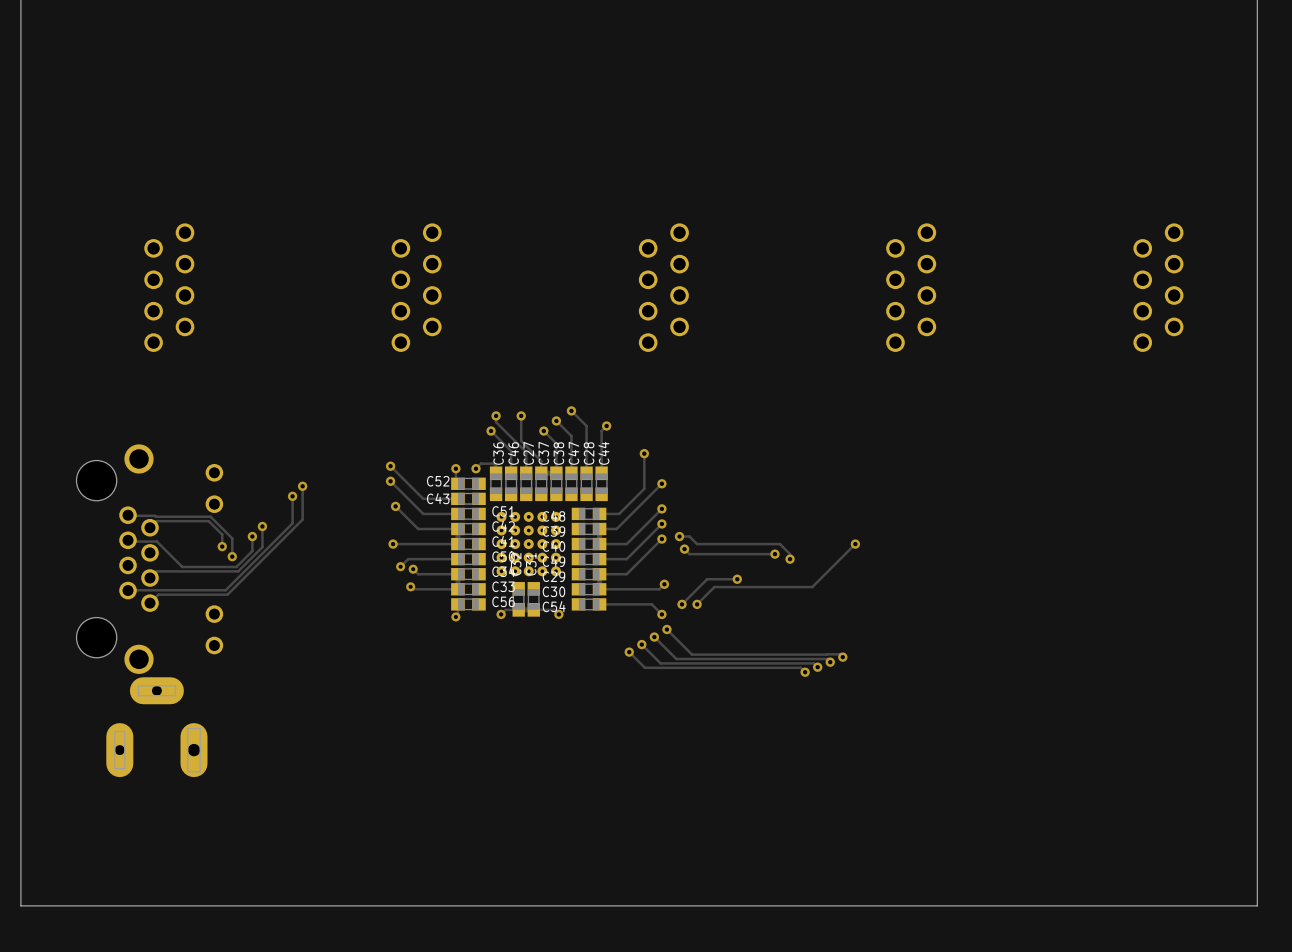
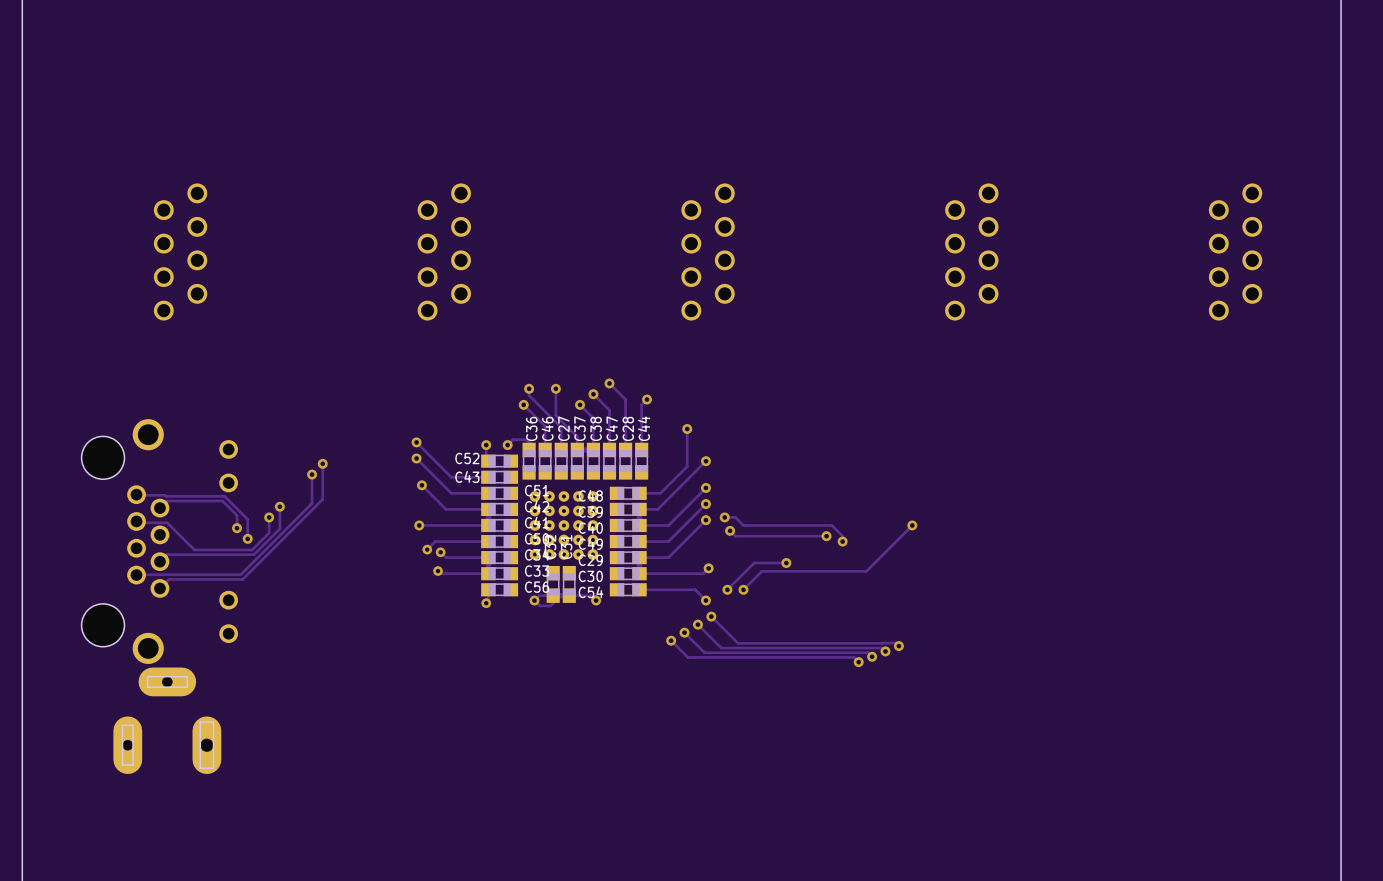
track: none -> (553, 595) (553, 603) (550, 605) (539, 605) (534, 600)

